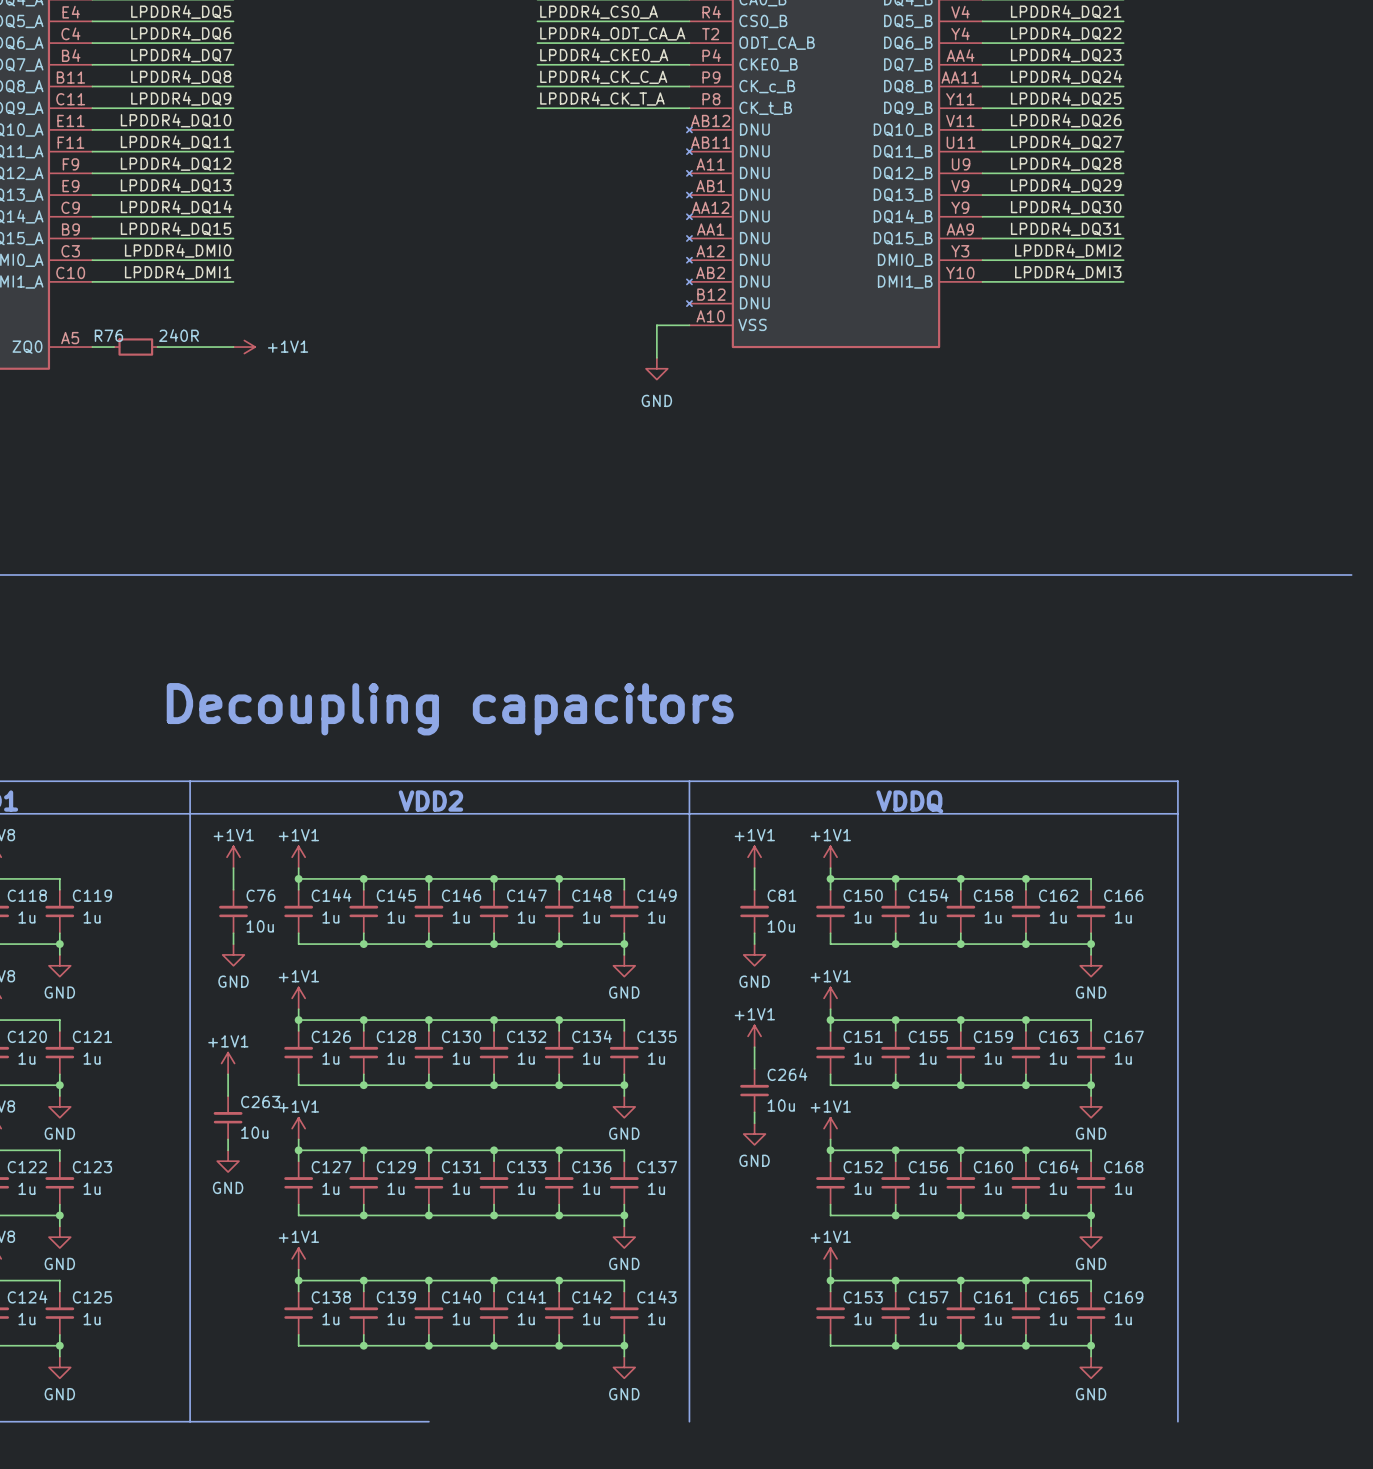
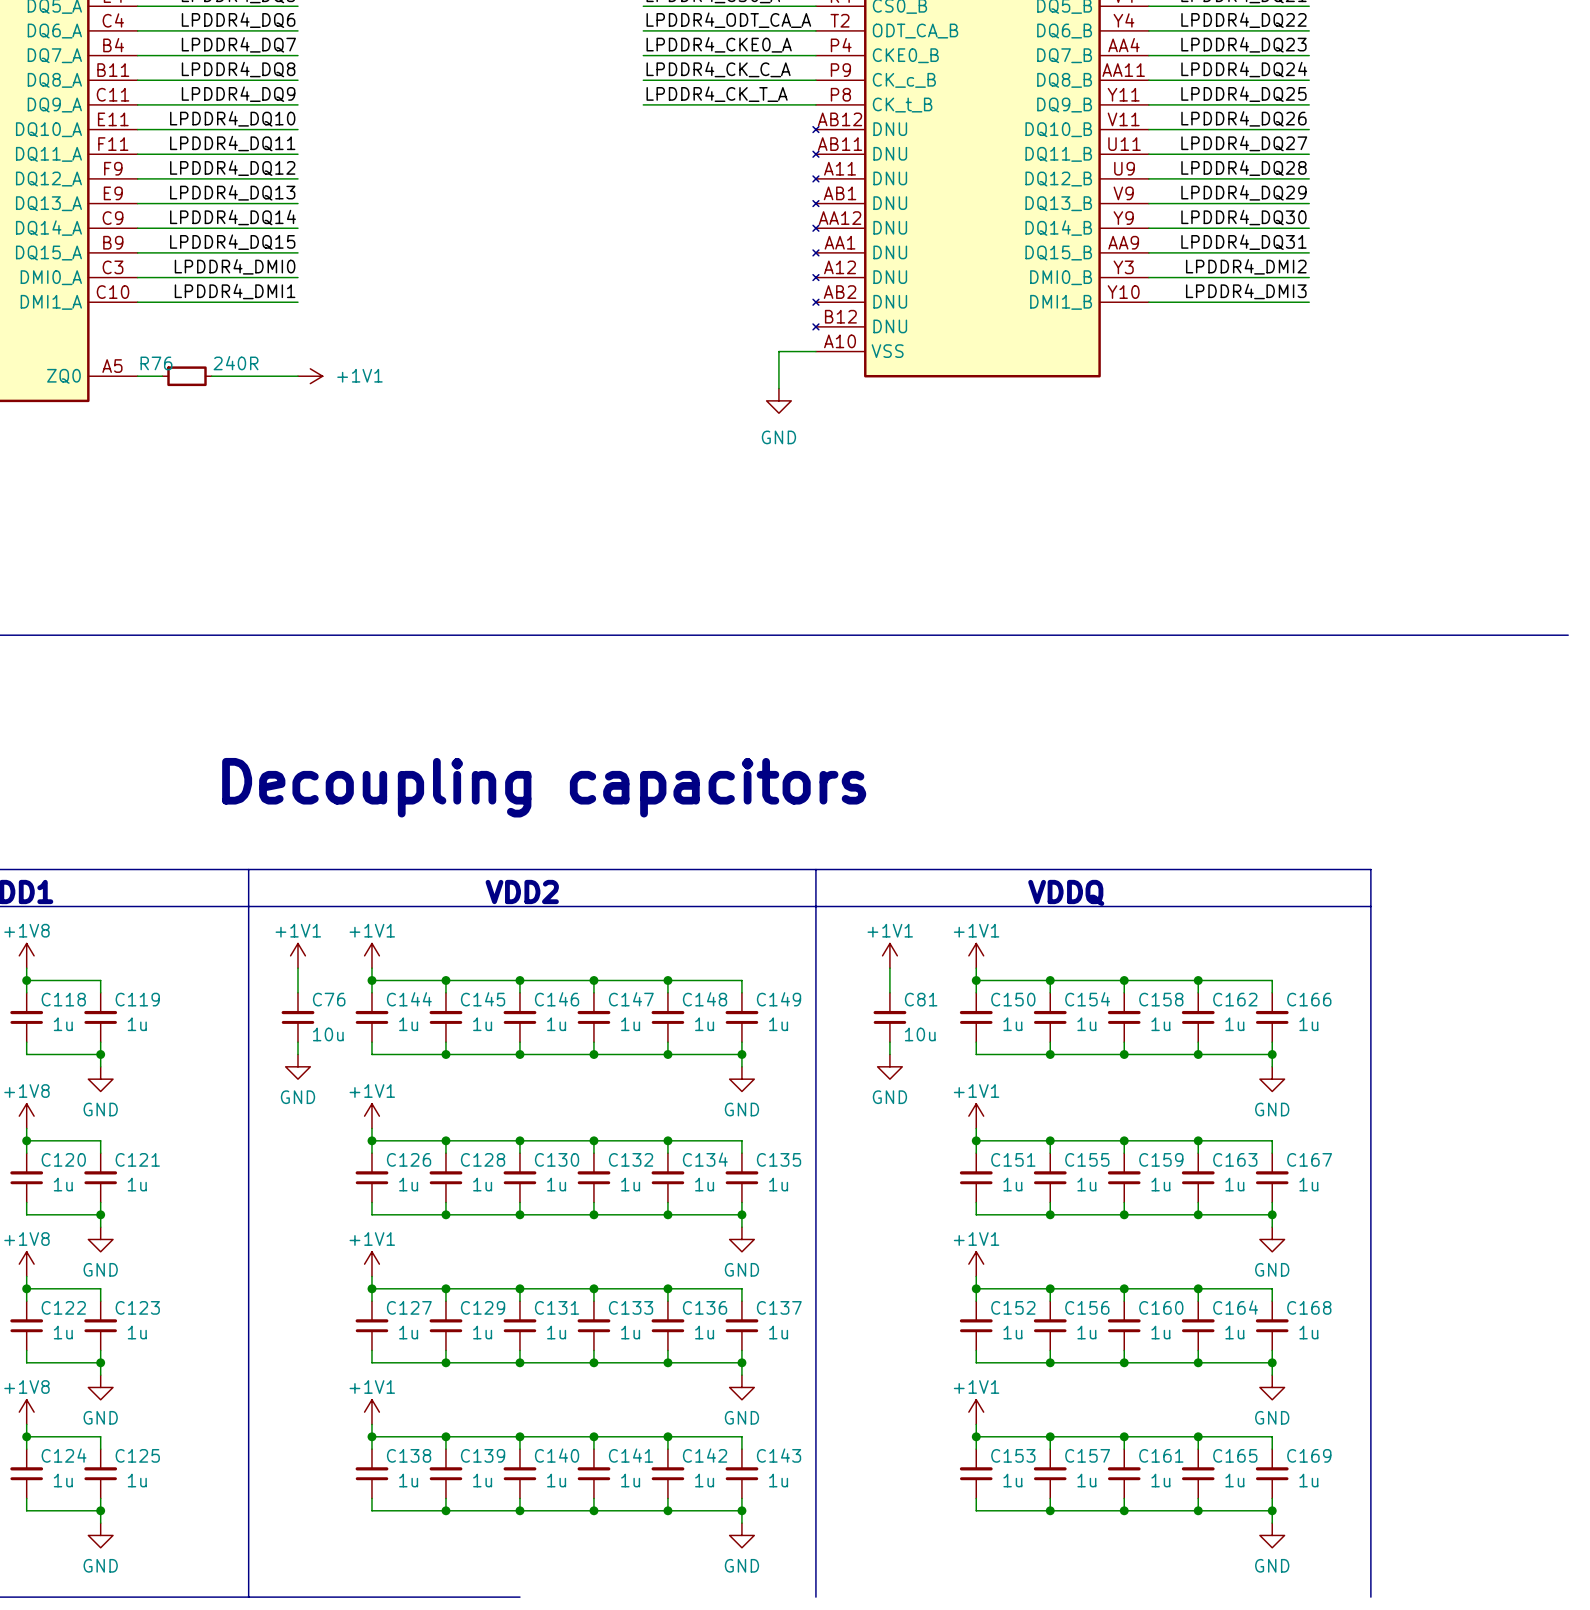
power symbol: +1V1 (754, 1036) -> none
wire: (754, 1047) (754, 1068) -> none
power symbol: +1V1 (228, 1063) -> none
wire: (228, 1074) (228, 1096) -> none
C264: (754, 1090) -> none
wire: (754, 1112) (754, 1123) -> none
C263: (228, 1117) -> none
power symbol: GND (754, 1134) -> none
wire: (228, 1139) (228, 1150) -> none
power symbol: GND (228, 1161) -> none

